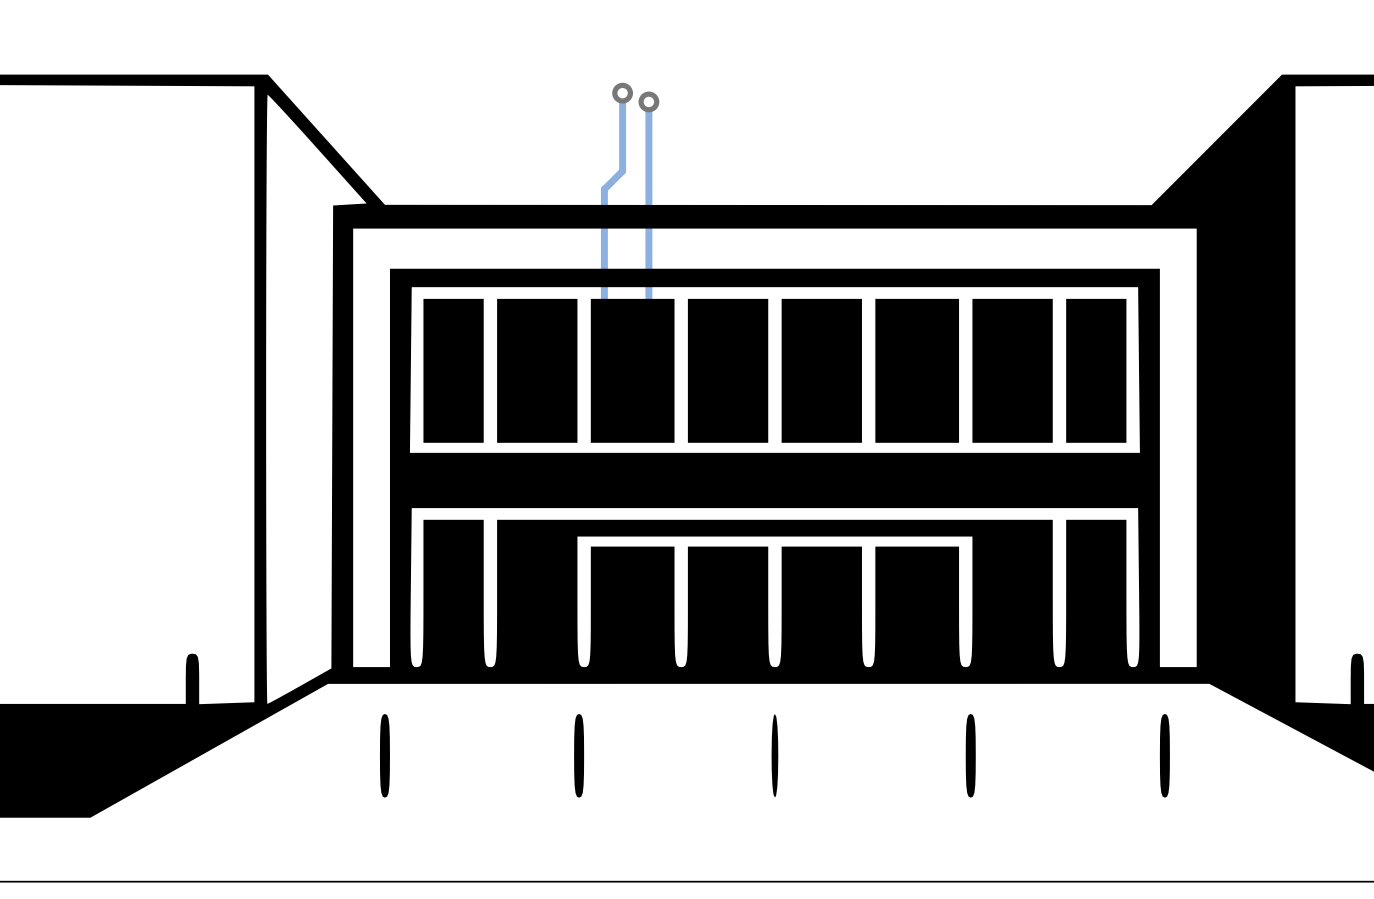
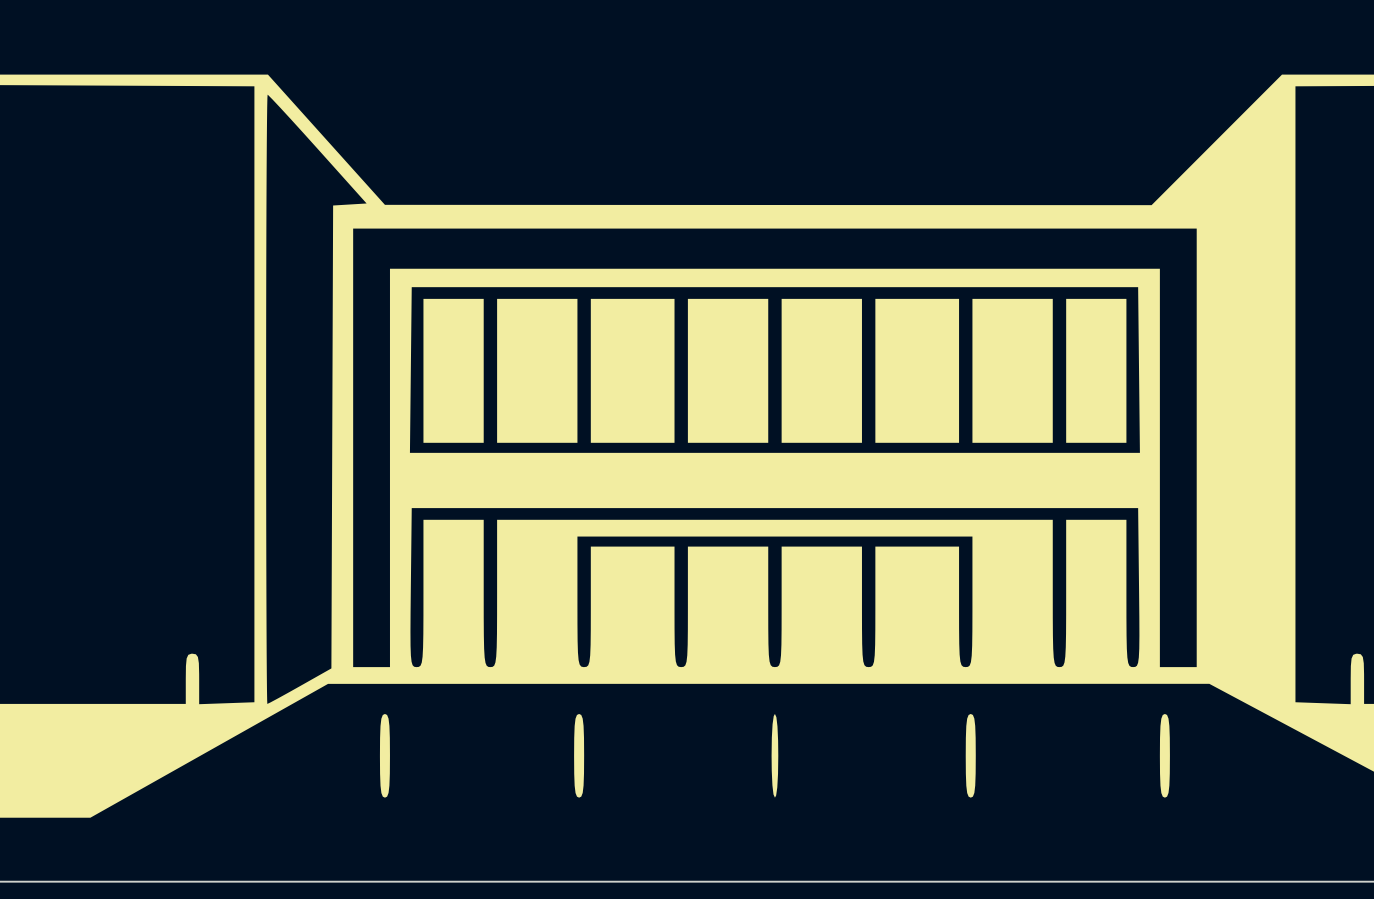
track: (622, 93) (622, 171) (604, 189) (604, 372) (631, 399) -> none
via: (622, 93) -> none
track: (648, 101) (648, 326) (631, 344) -> none
via: (648, 101) -> none

